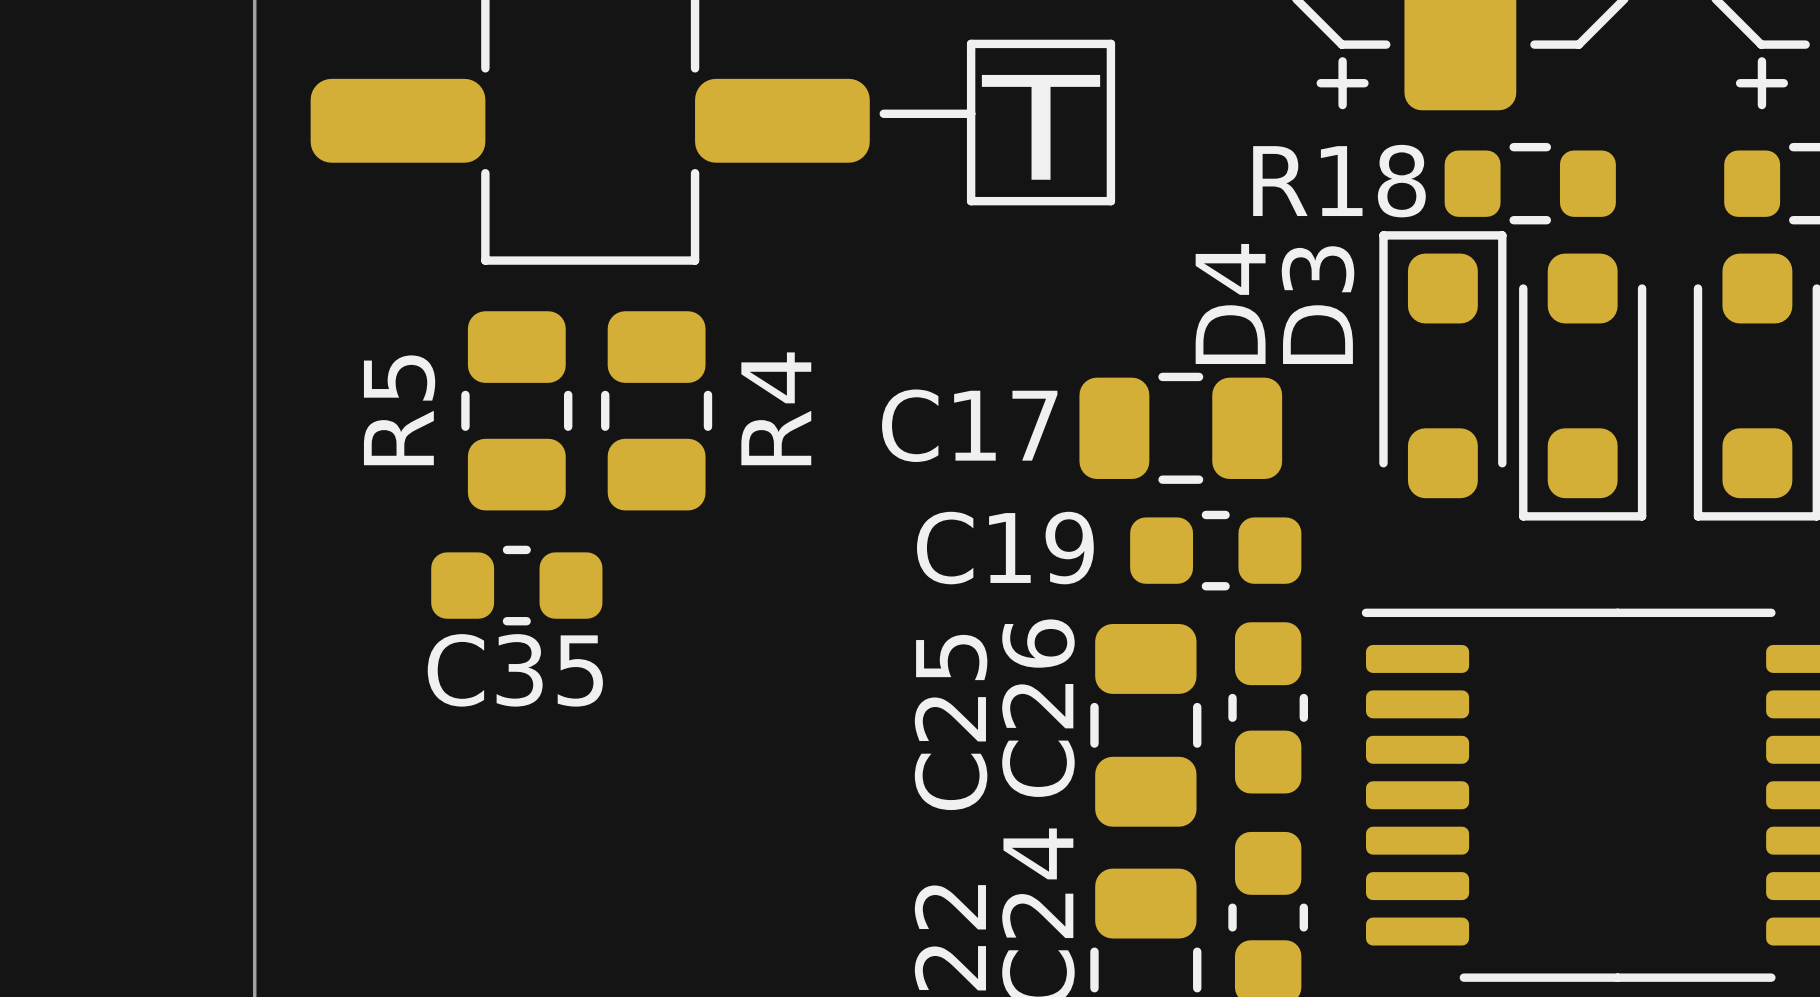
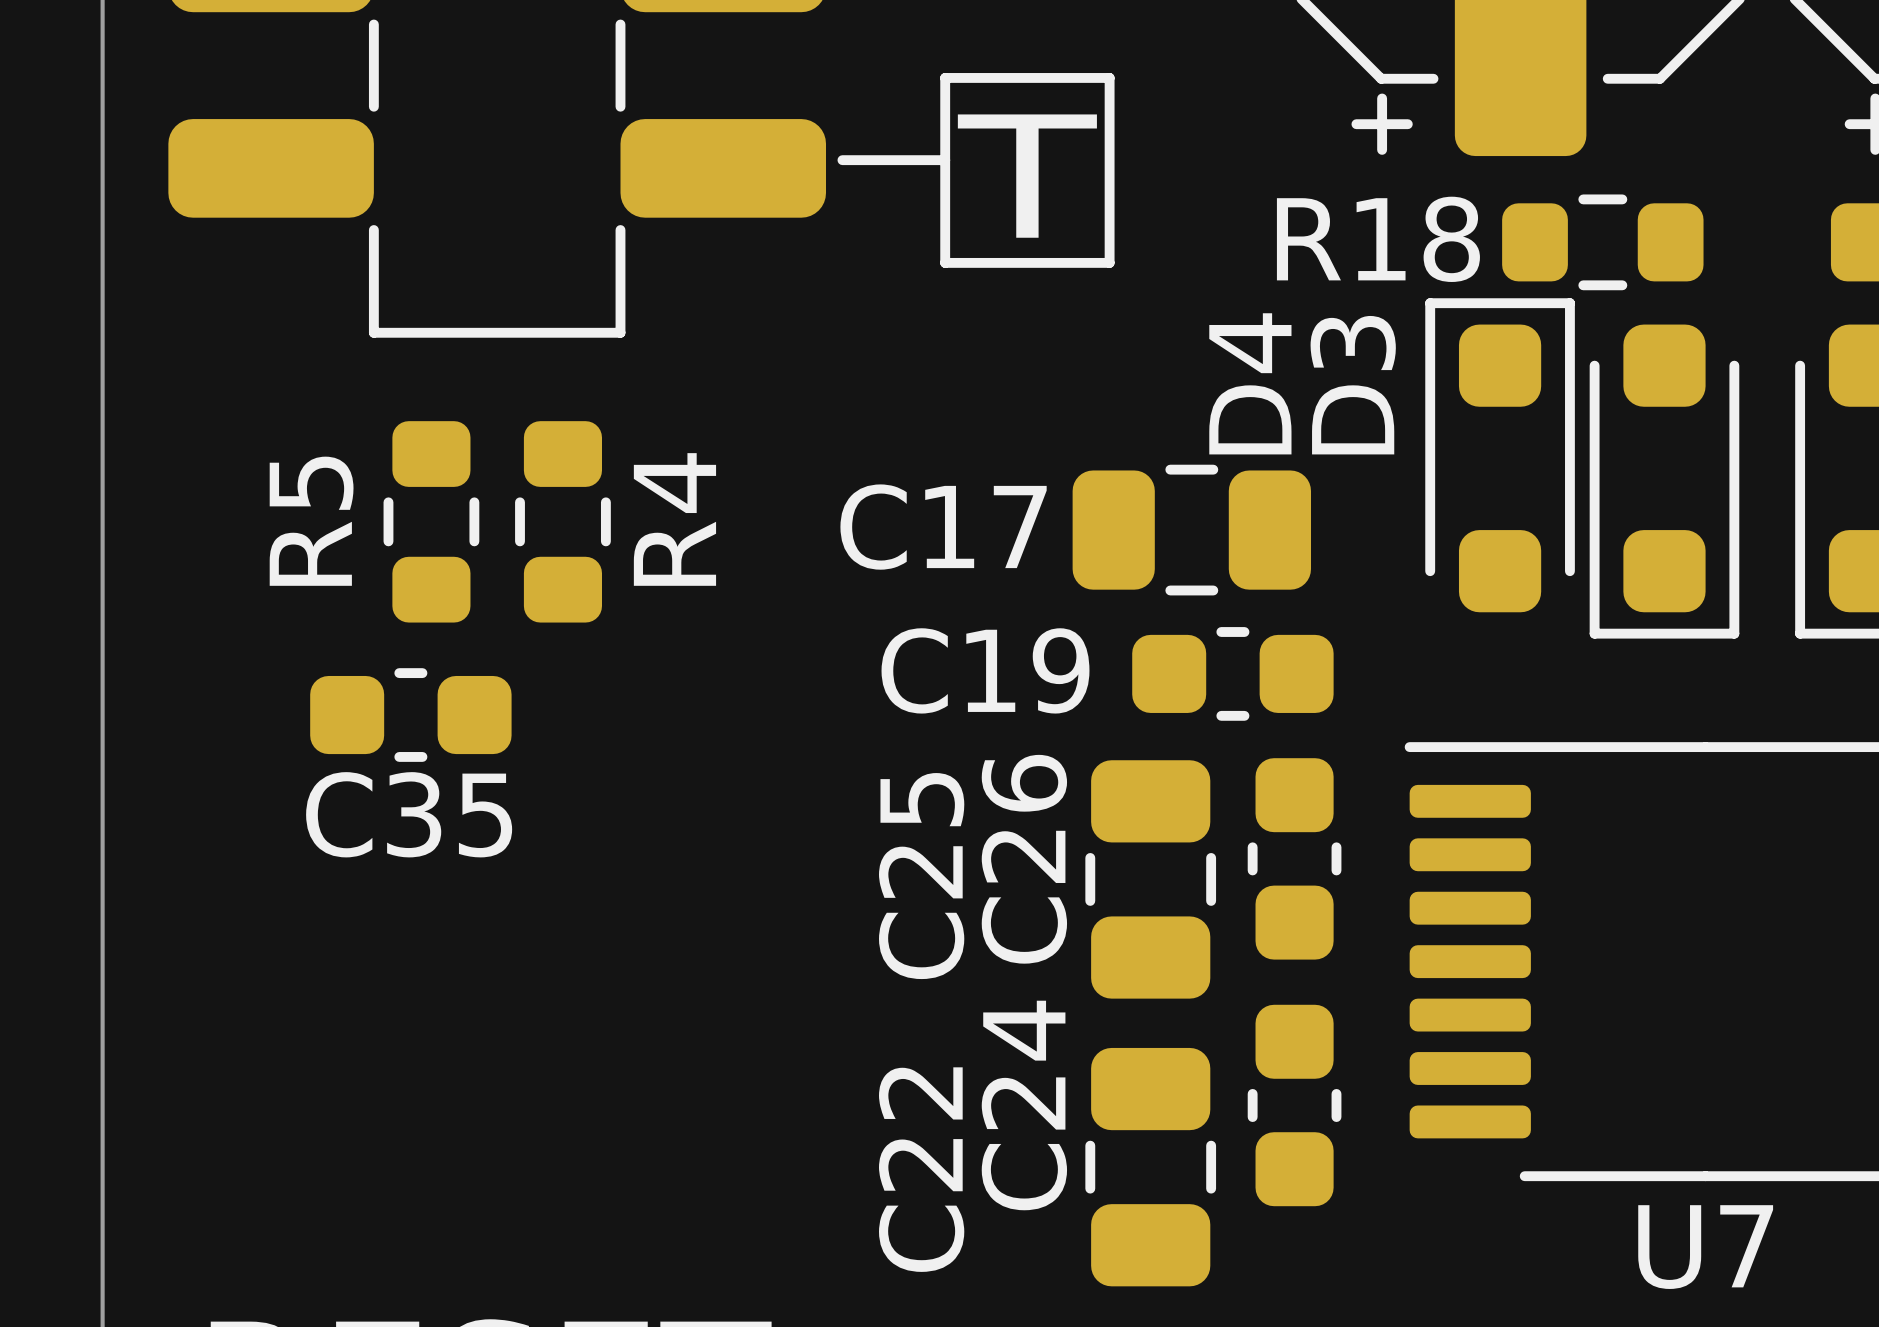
R5 footprint: [461, 311, 573, 511] -> [383, 421, 480, 623]
R4 footprint: [601, 311, 713, 511] -> [515, 421, 611, 623]
R4 name position: R4 (776, 408) -> R4 (674, 519)
R5 name position: R5 (399, 410) -> R5 (311, 521)

